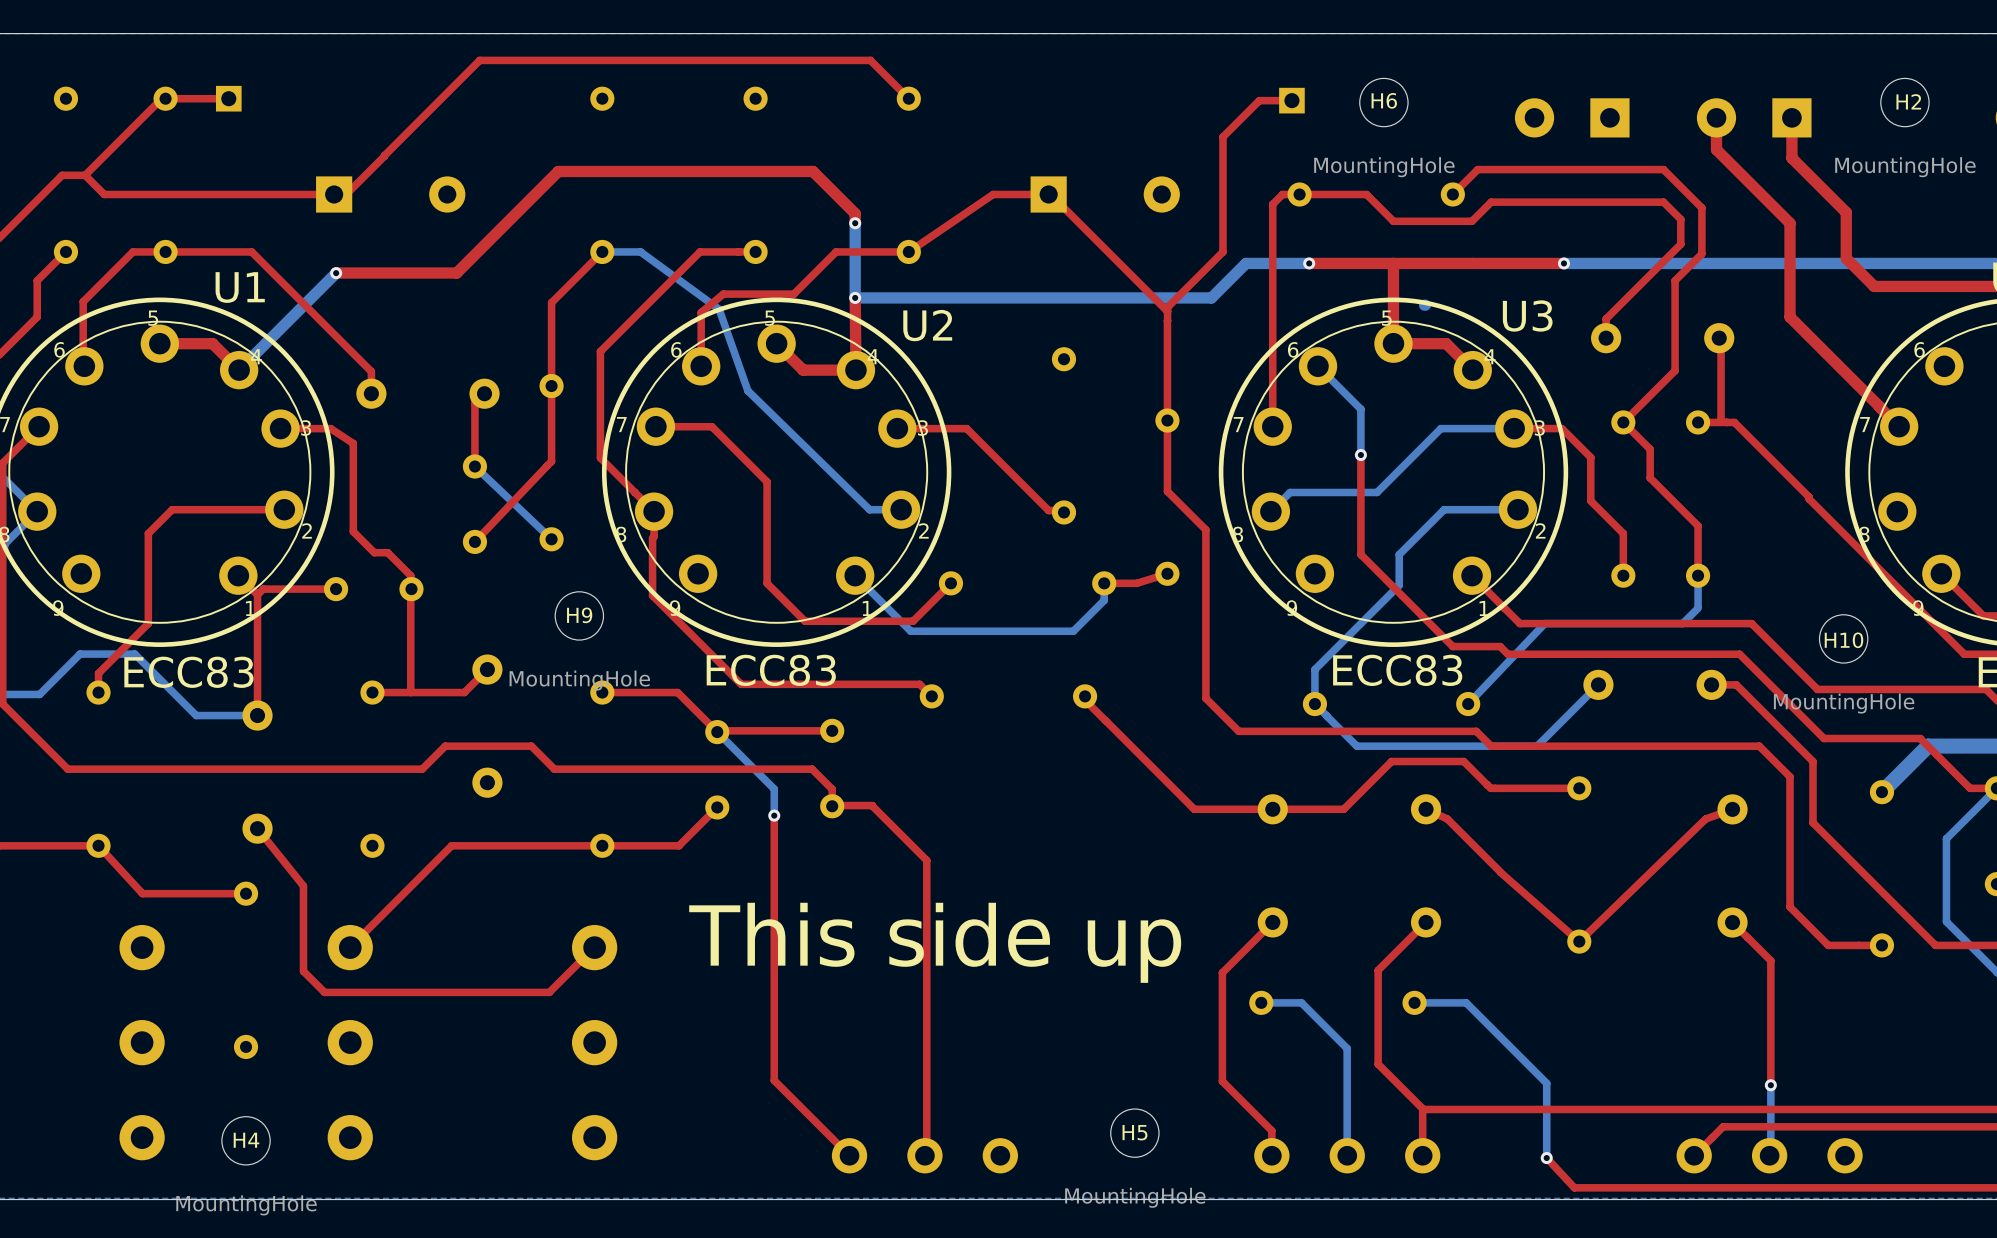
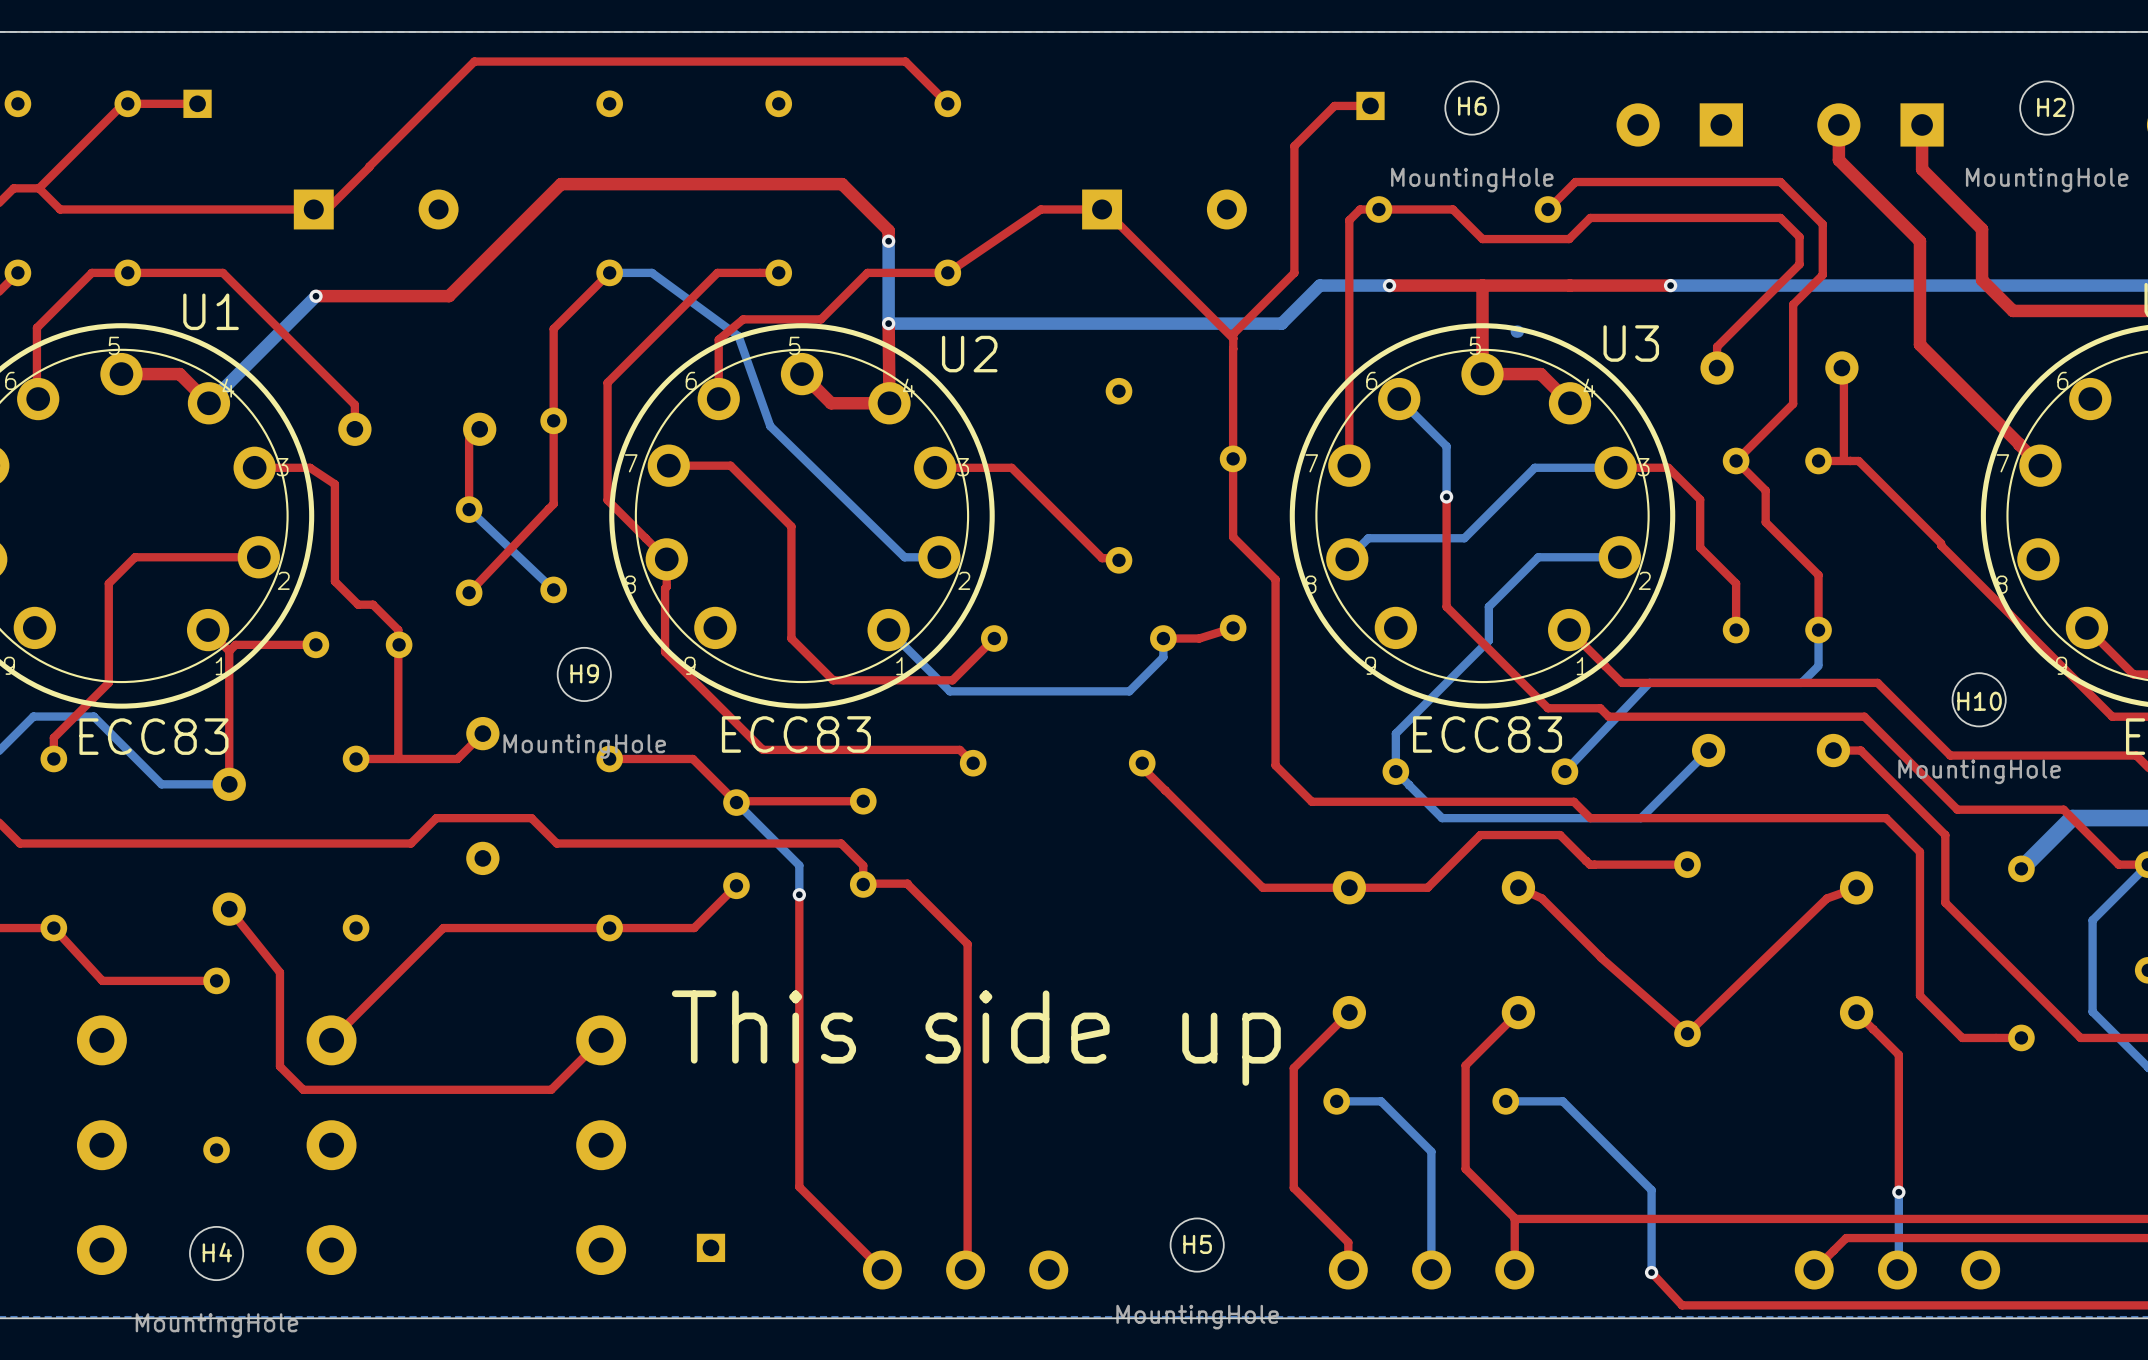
part: none -> (710, 1247)

